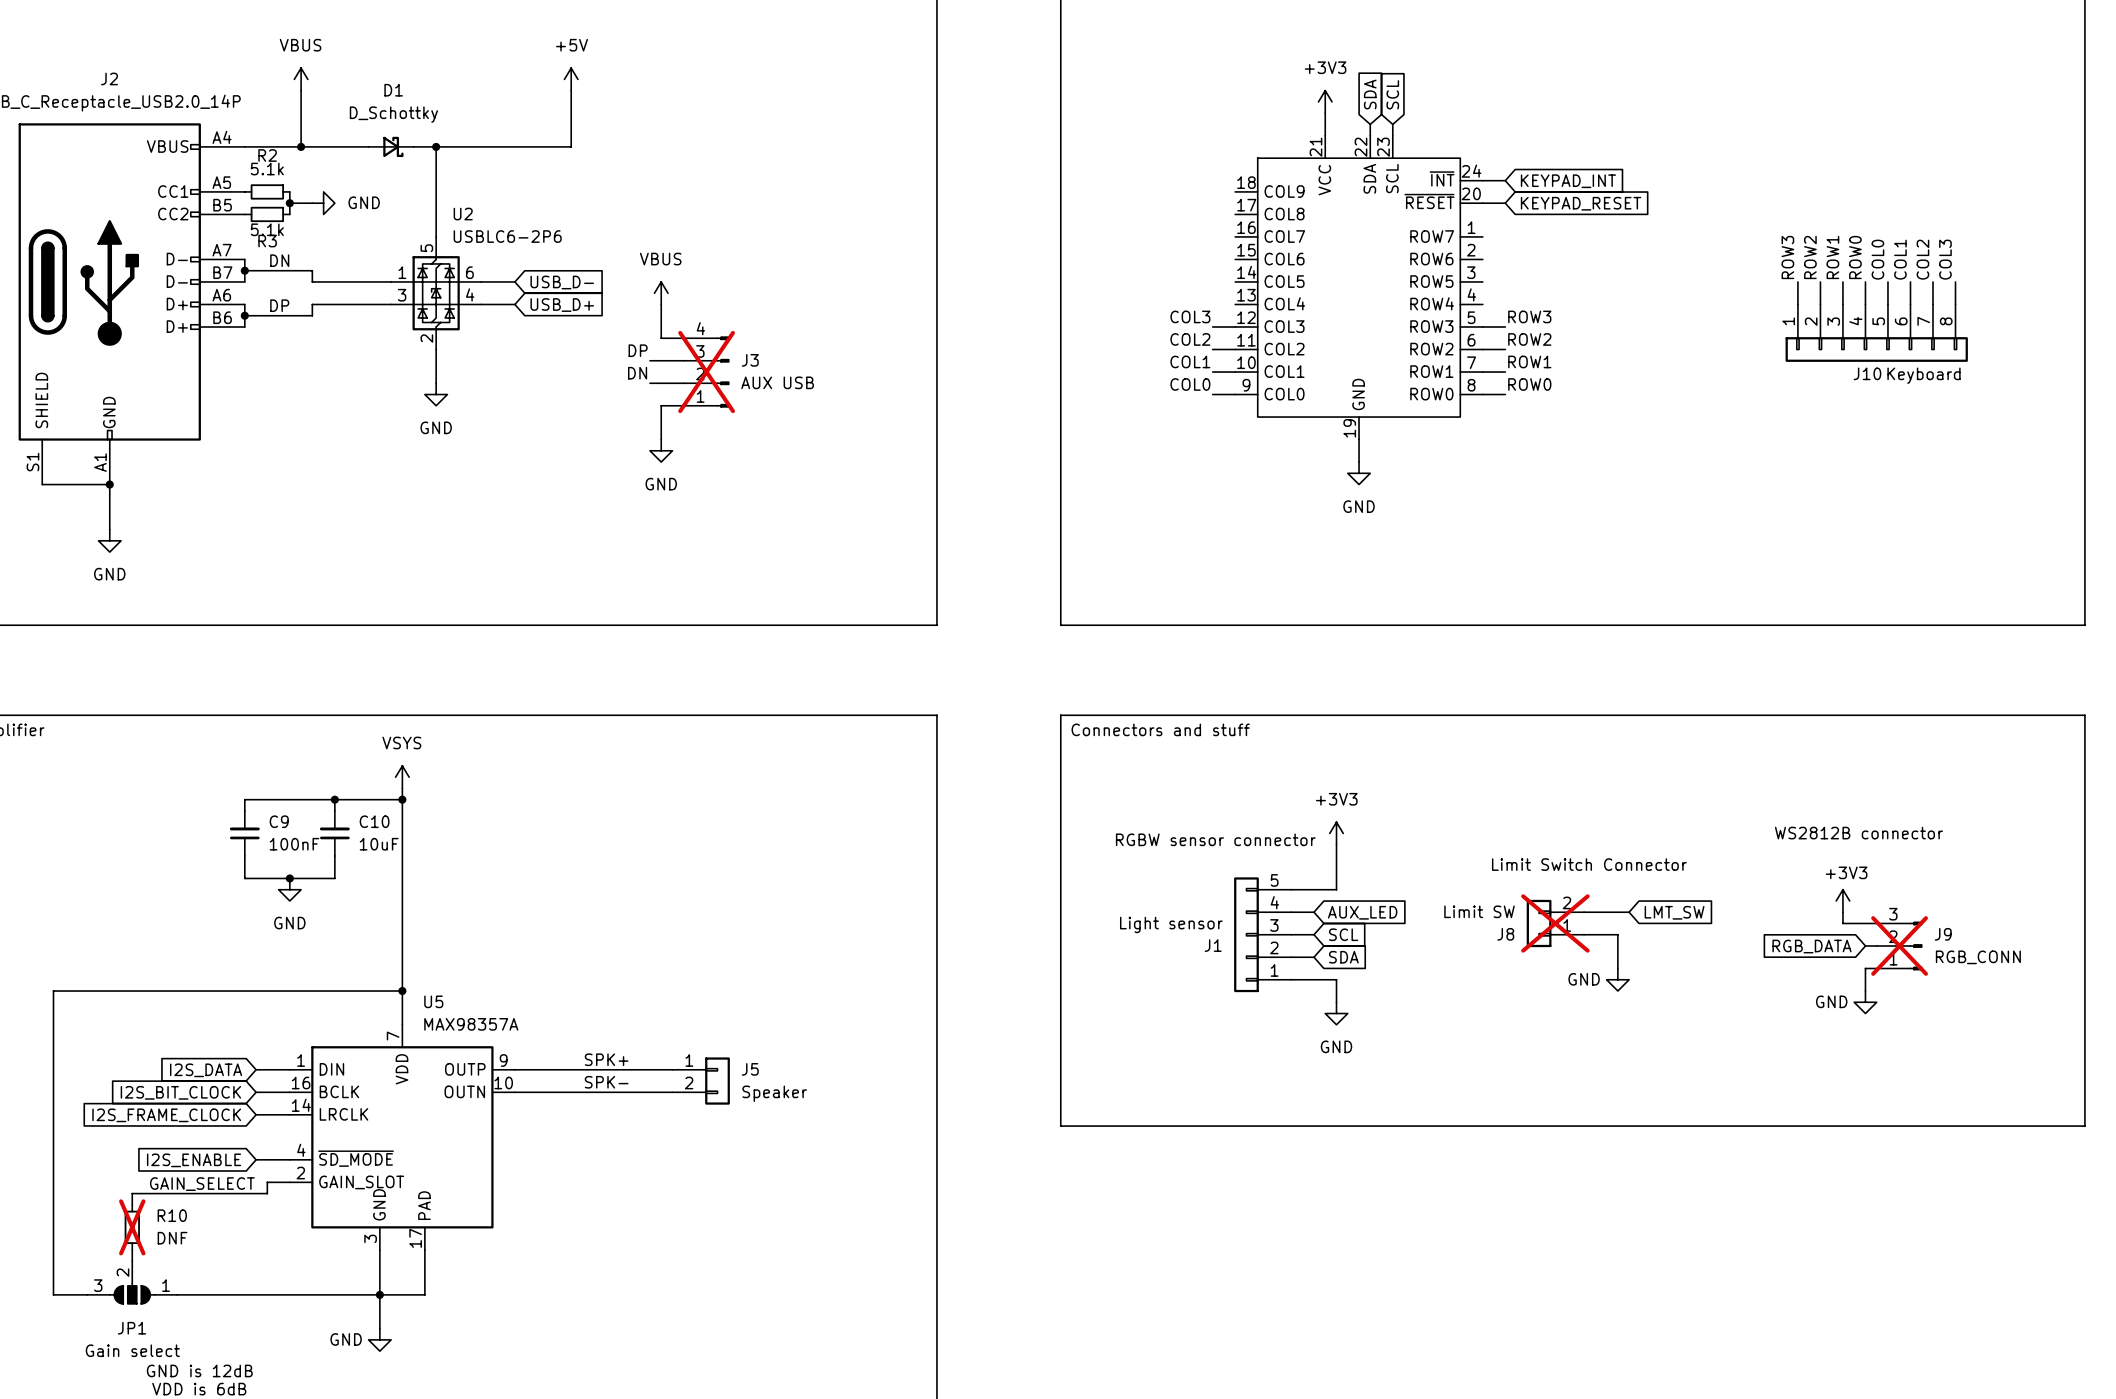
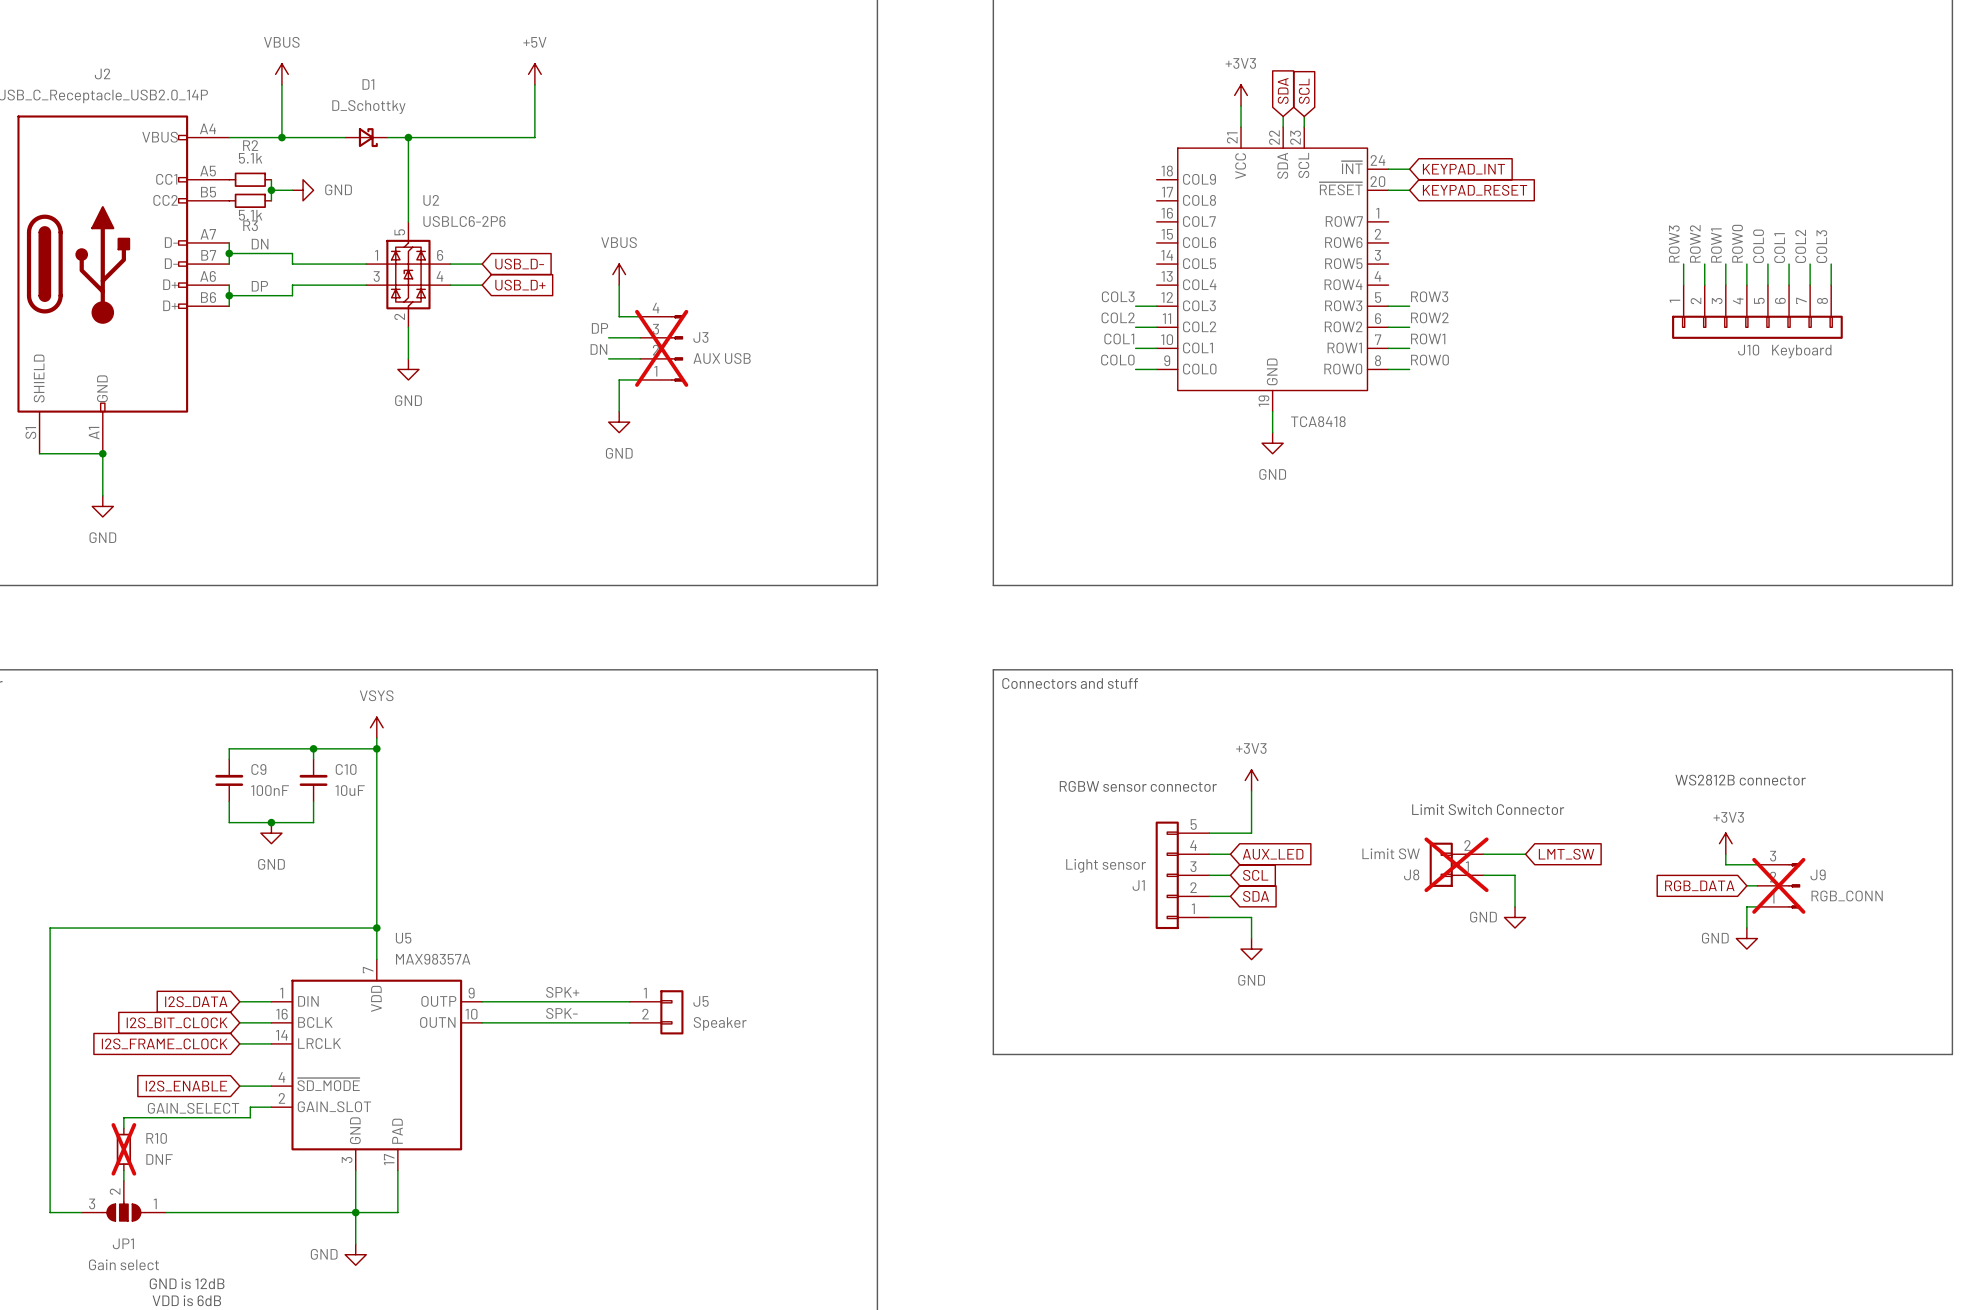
part value: none -> TCA8418 (1318, 421)

